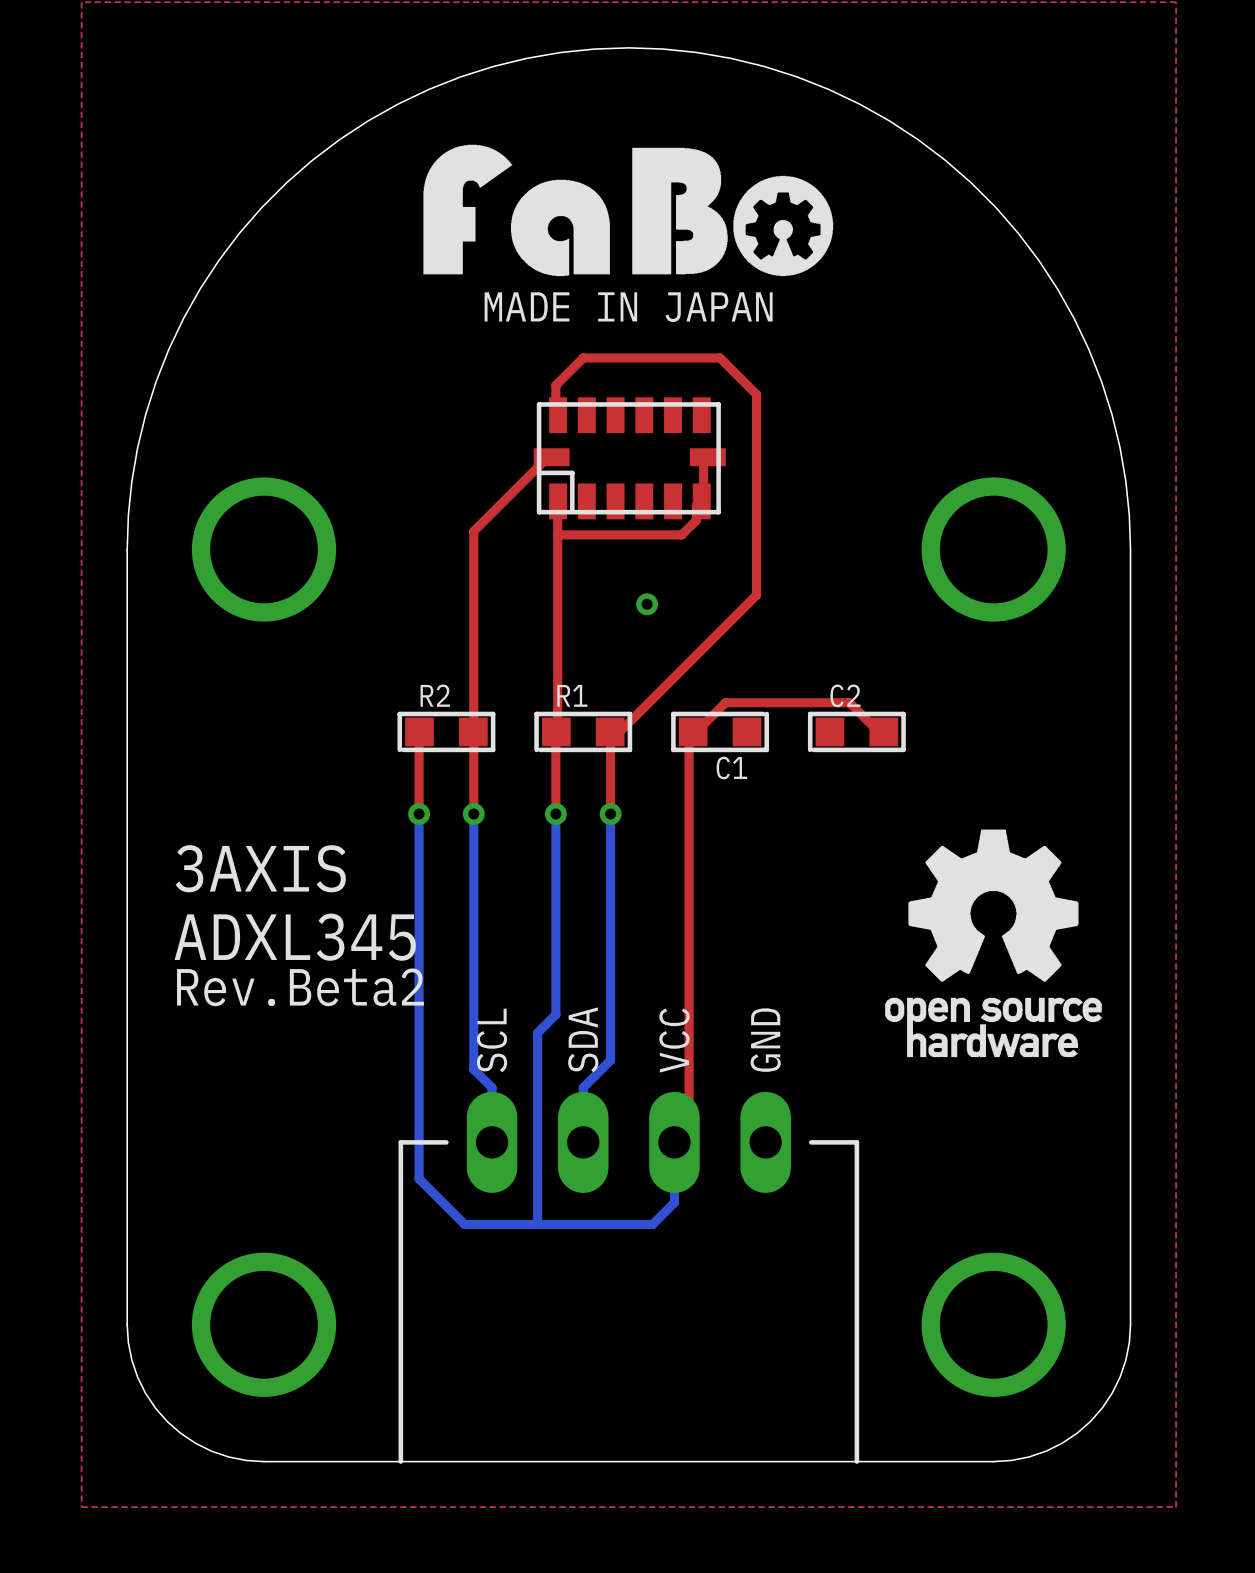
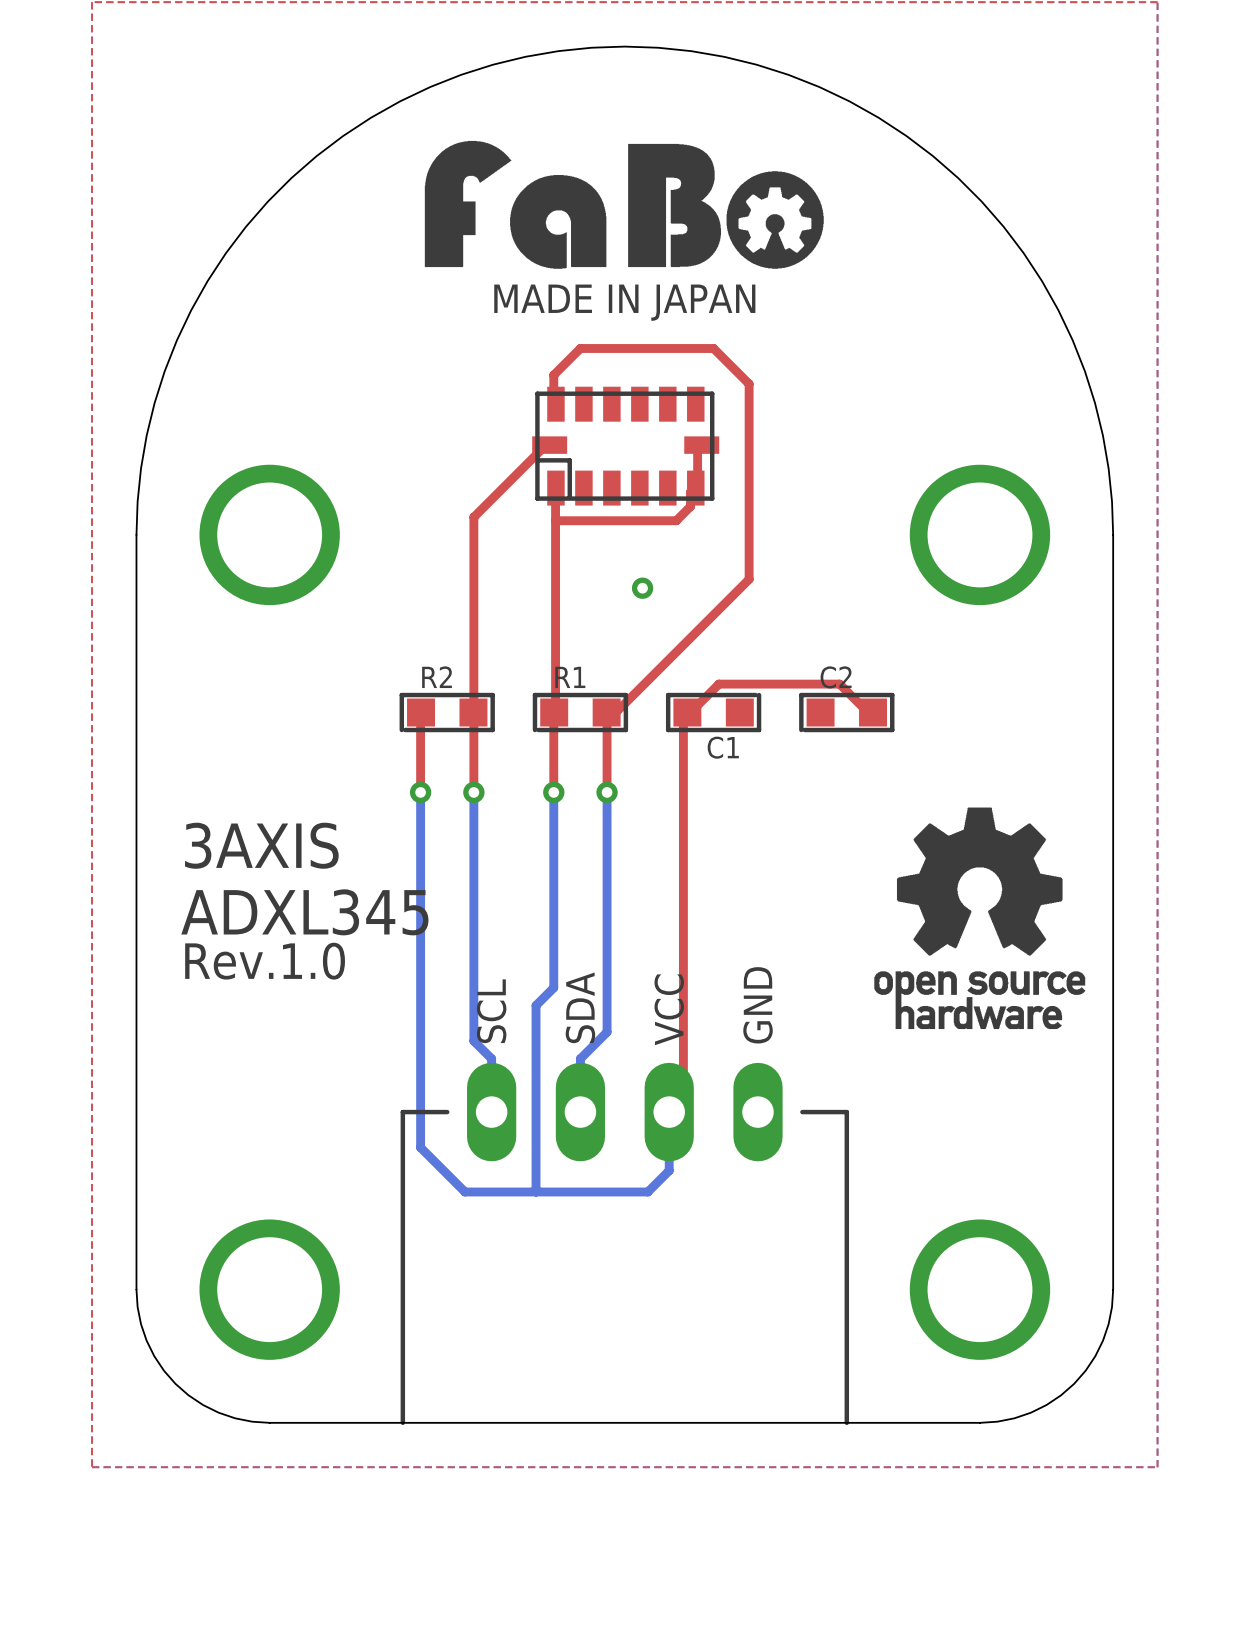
text: Rev.Beta2 (300, 987) -> Rev.1.0 (265, 961)

